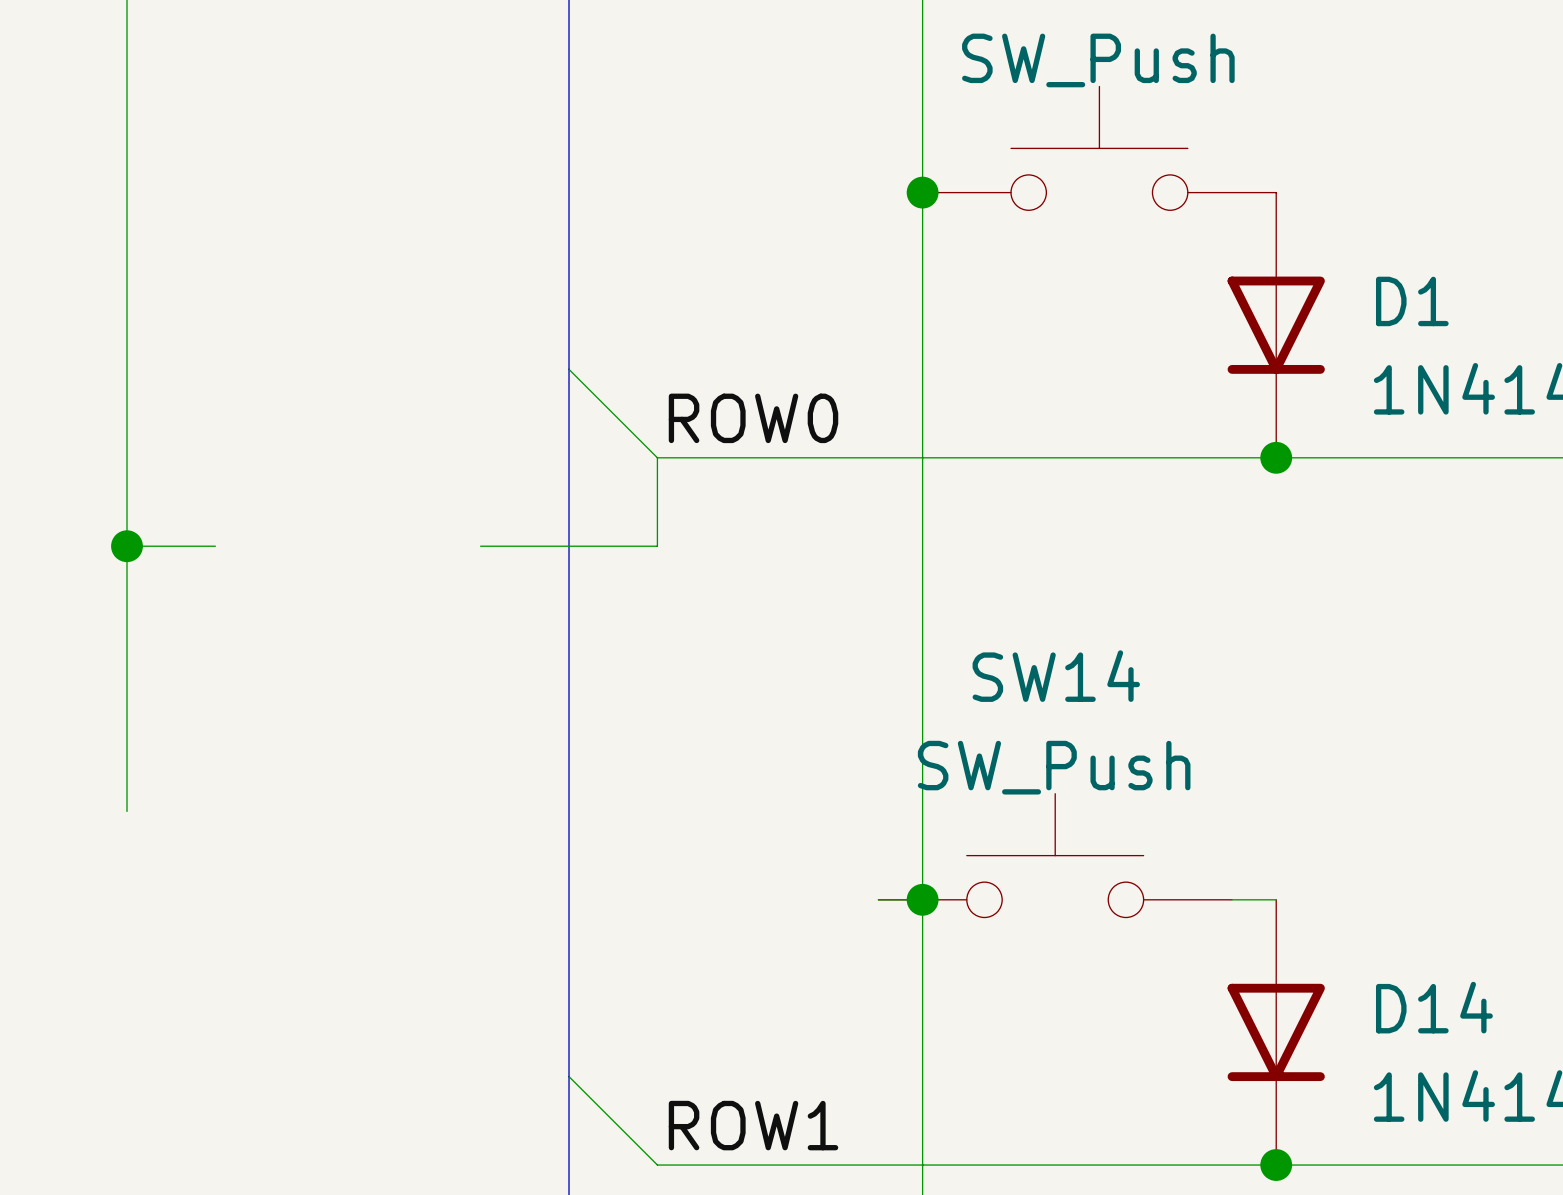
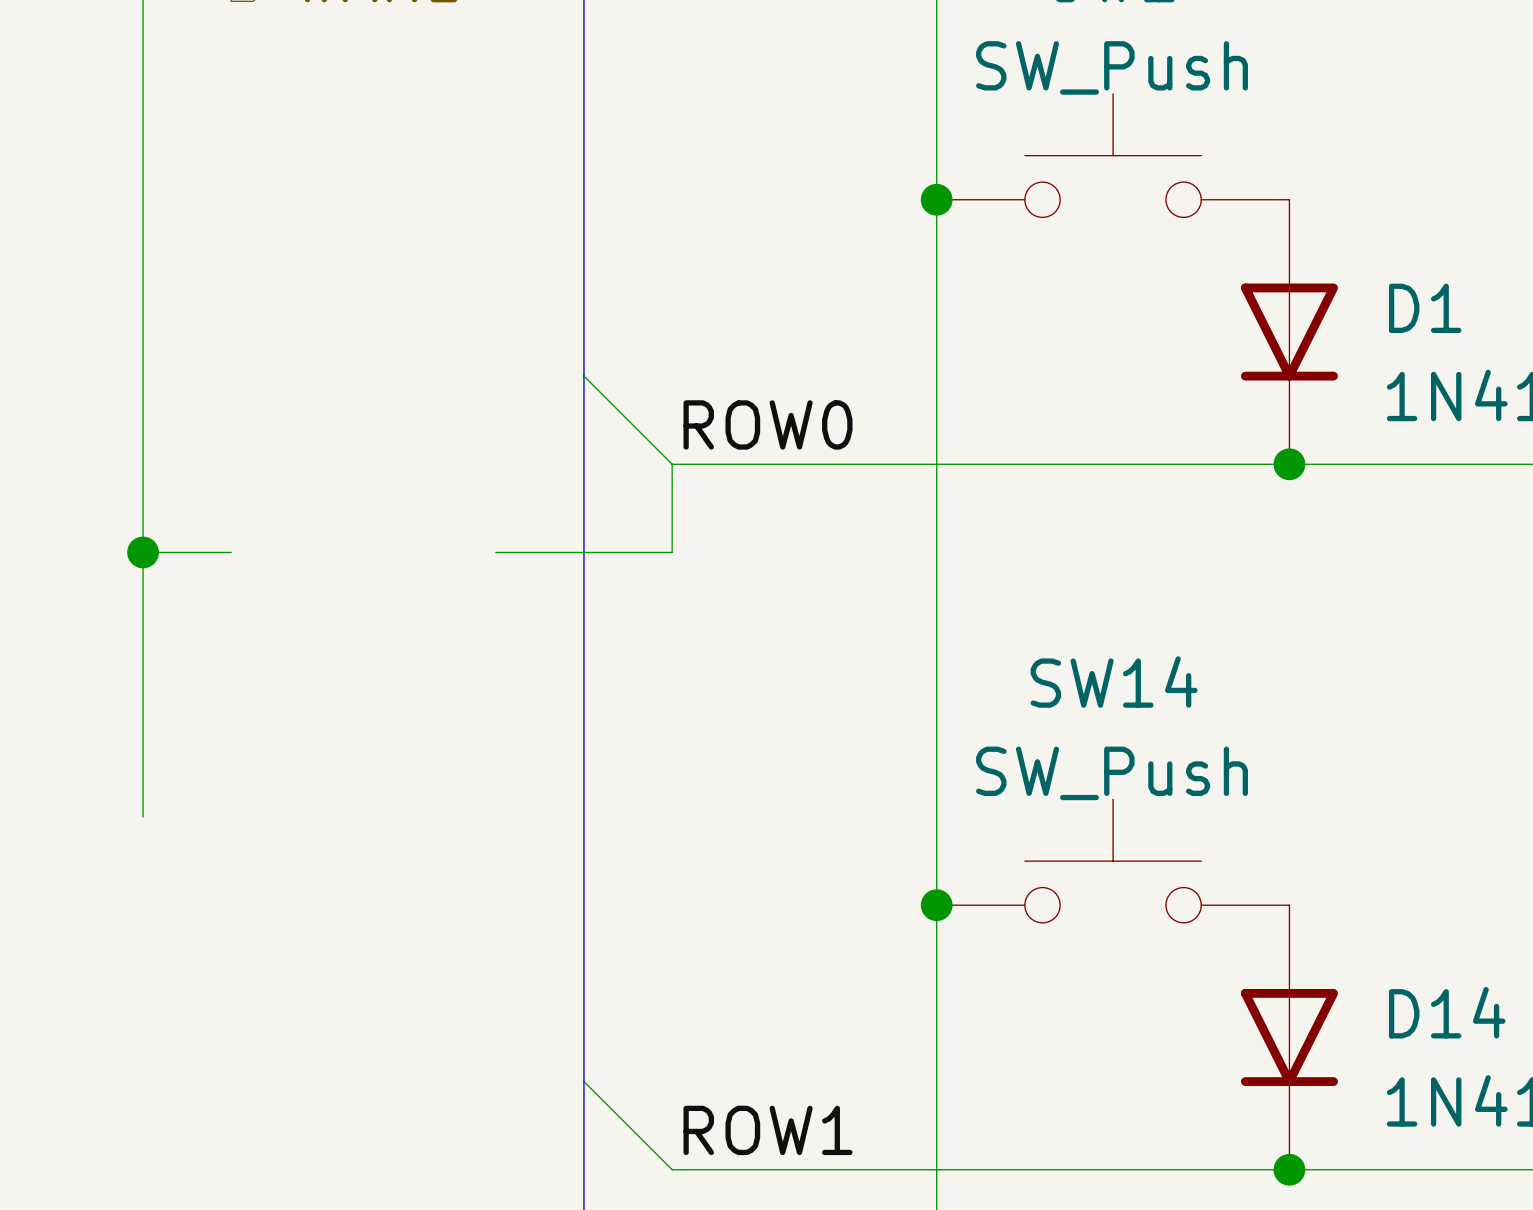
SW14 position: (1055, 855) -> (1113, 861)
wire: (878, 899) (922, 899) -> none

